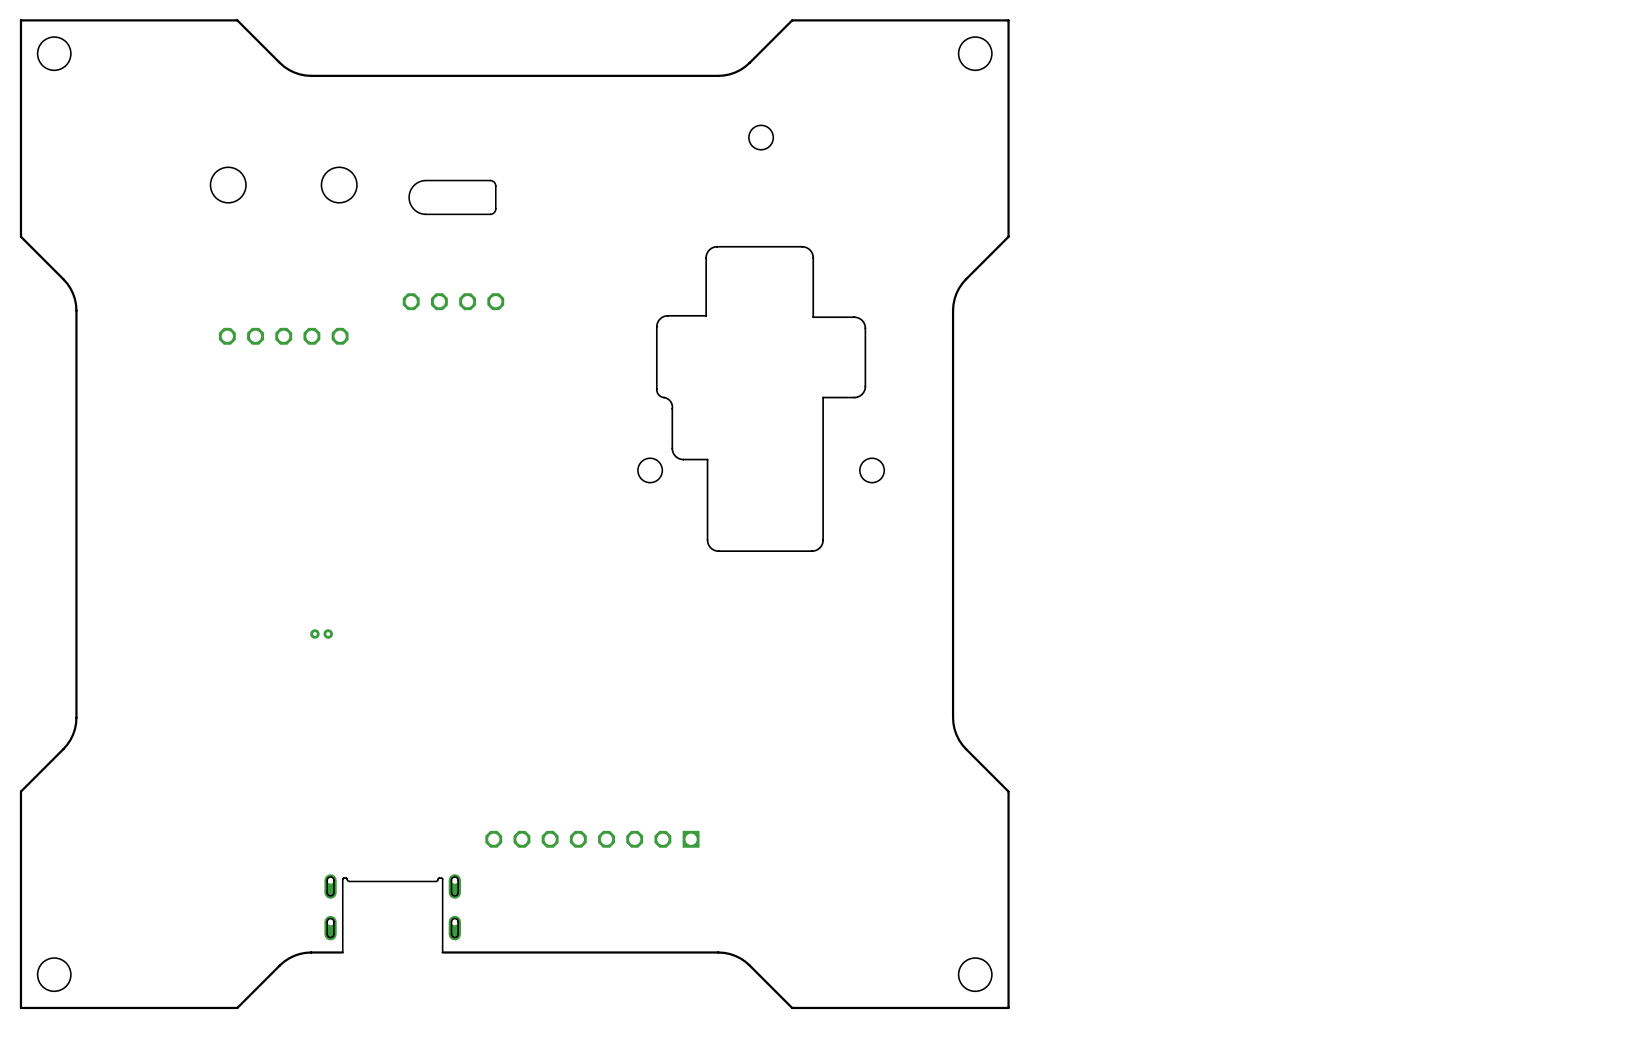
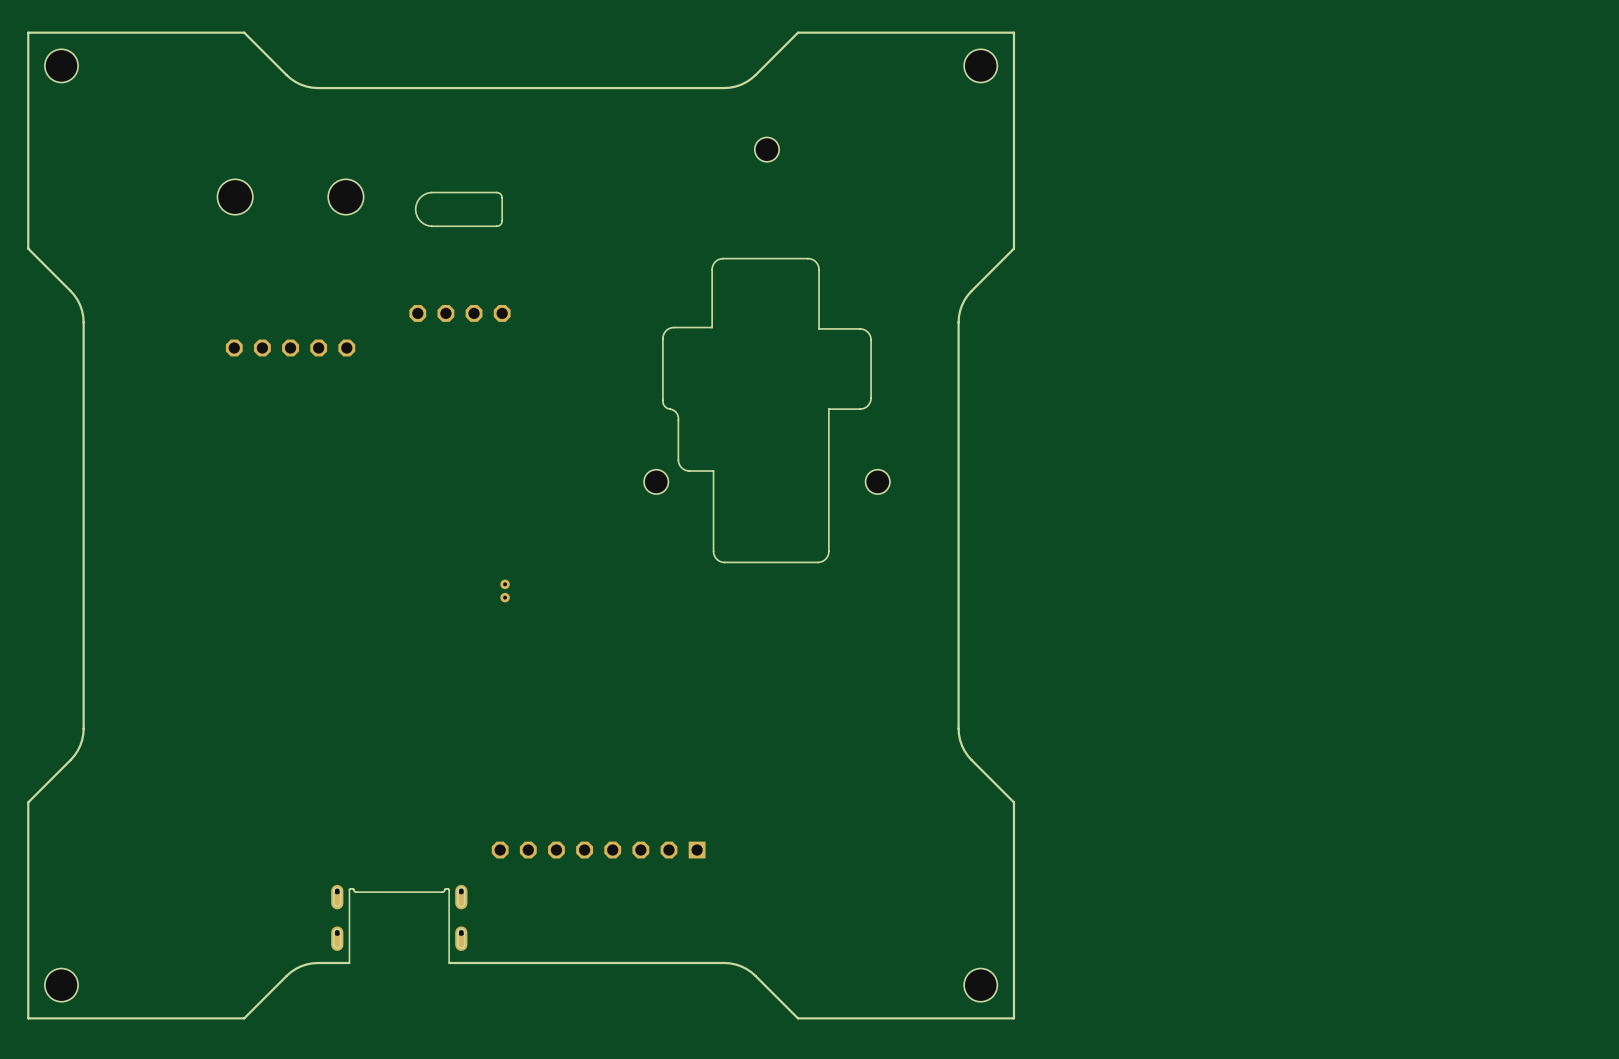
part rotation: 0° (321, 634) -> 90° clockwise (505, 590)
part position: (321, 634) -> (505, 590)

